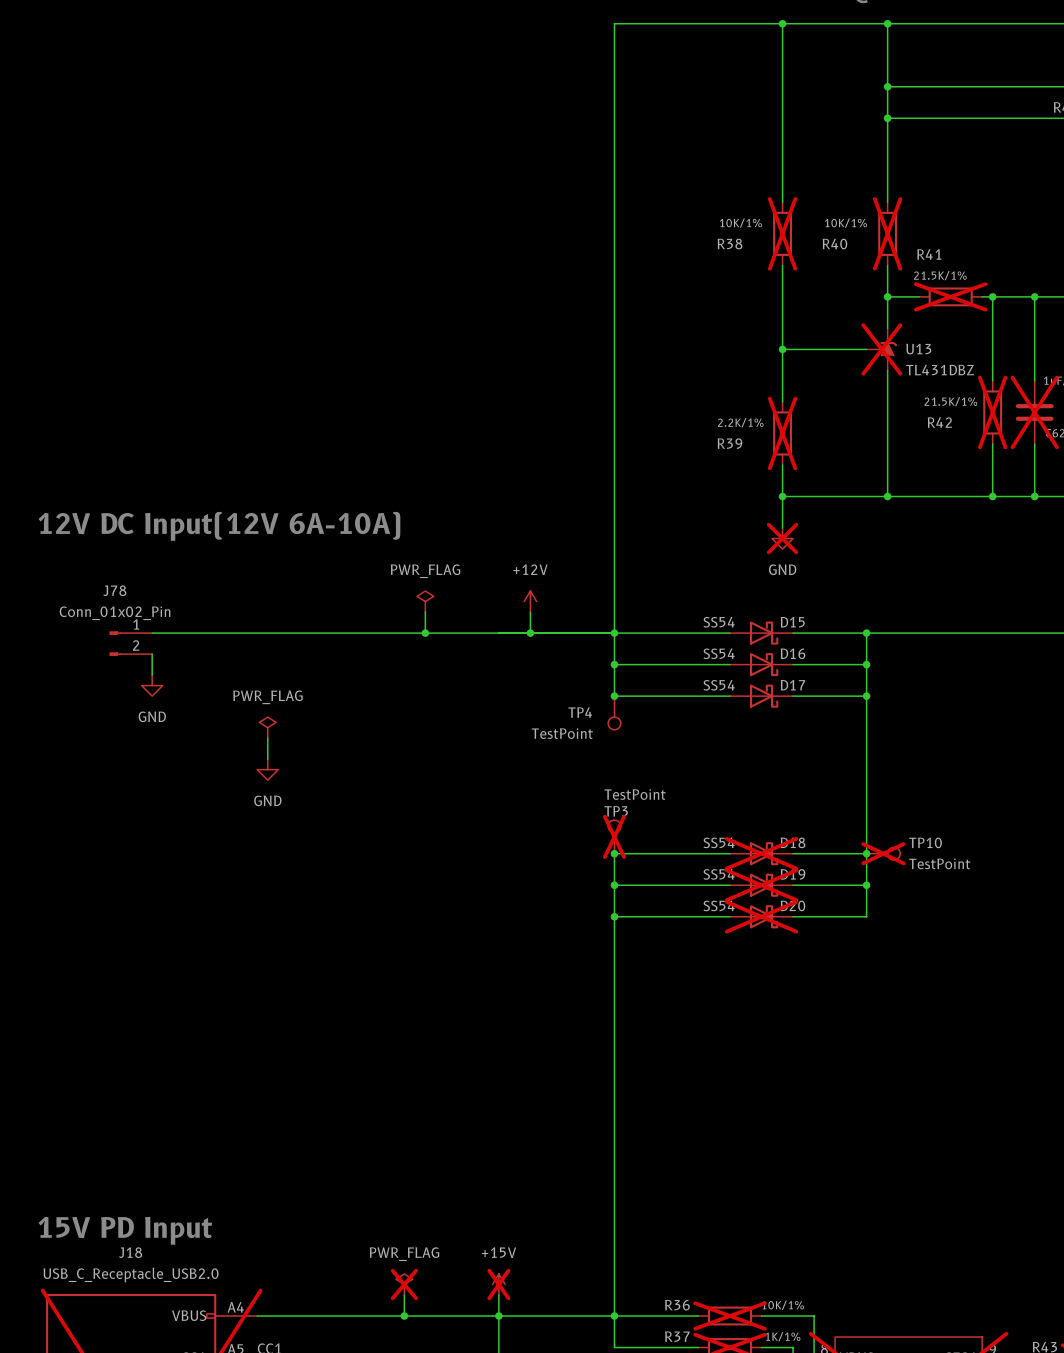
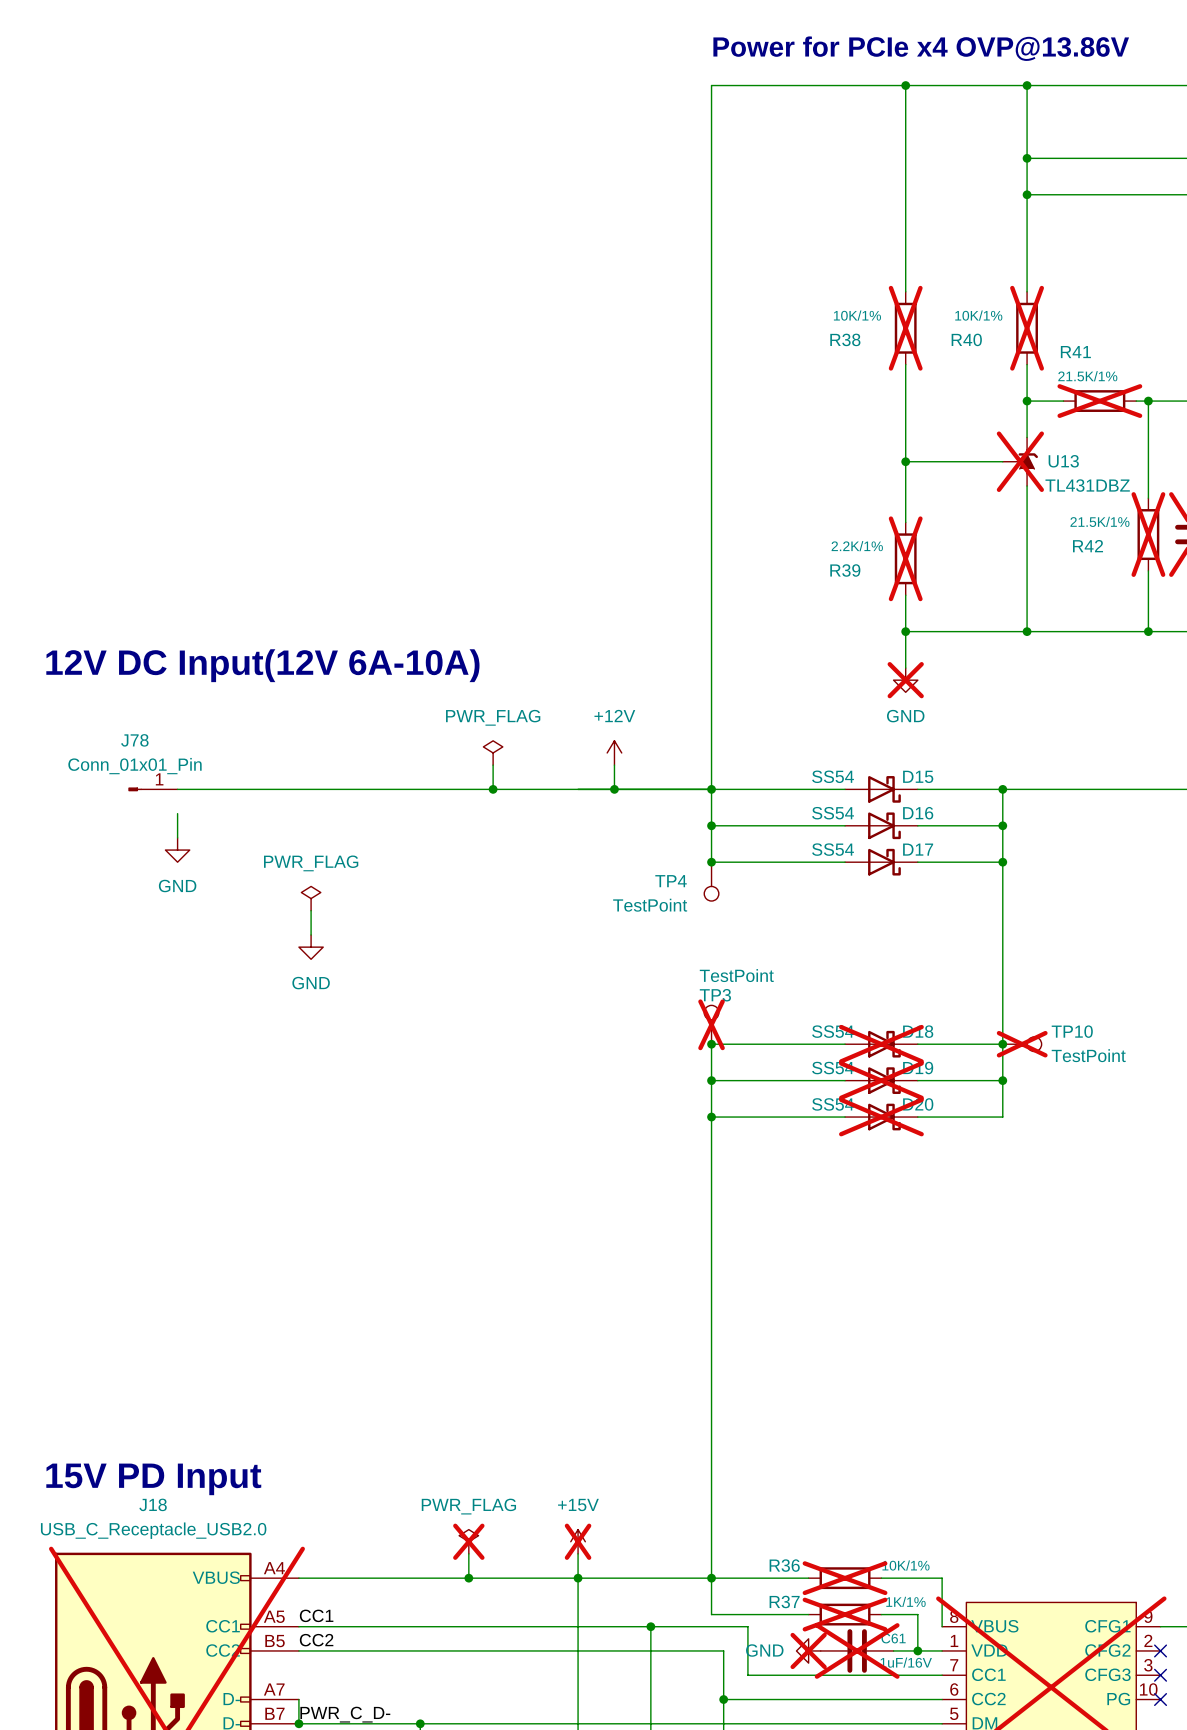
J78 value: Conn_01x02_Pin (115, 613) -> Conn_01x01_Pin (134, 766)
J78 symbol: [109, 631, 153, 656] -> [128, 787, 178, 792]

